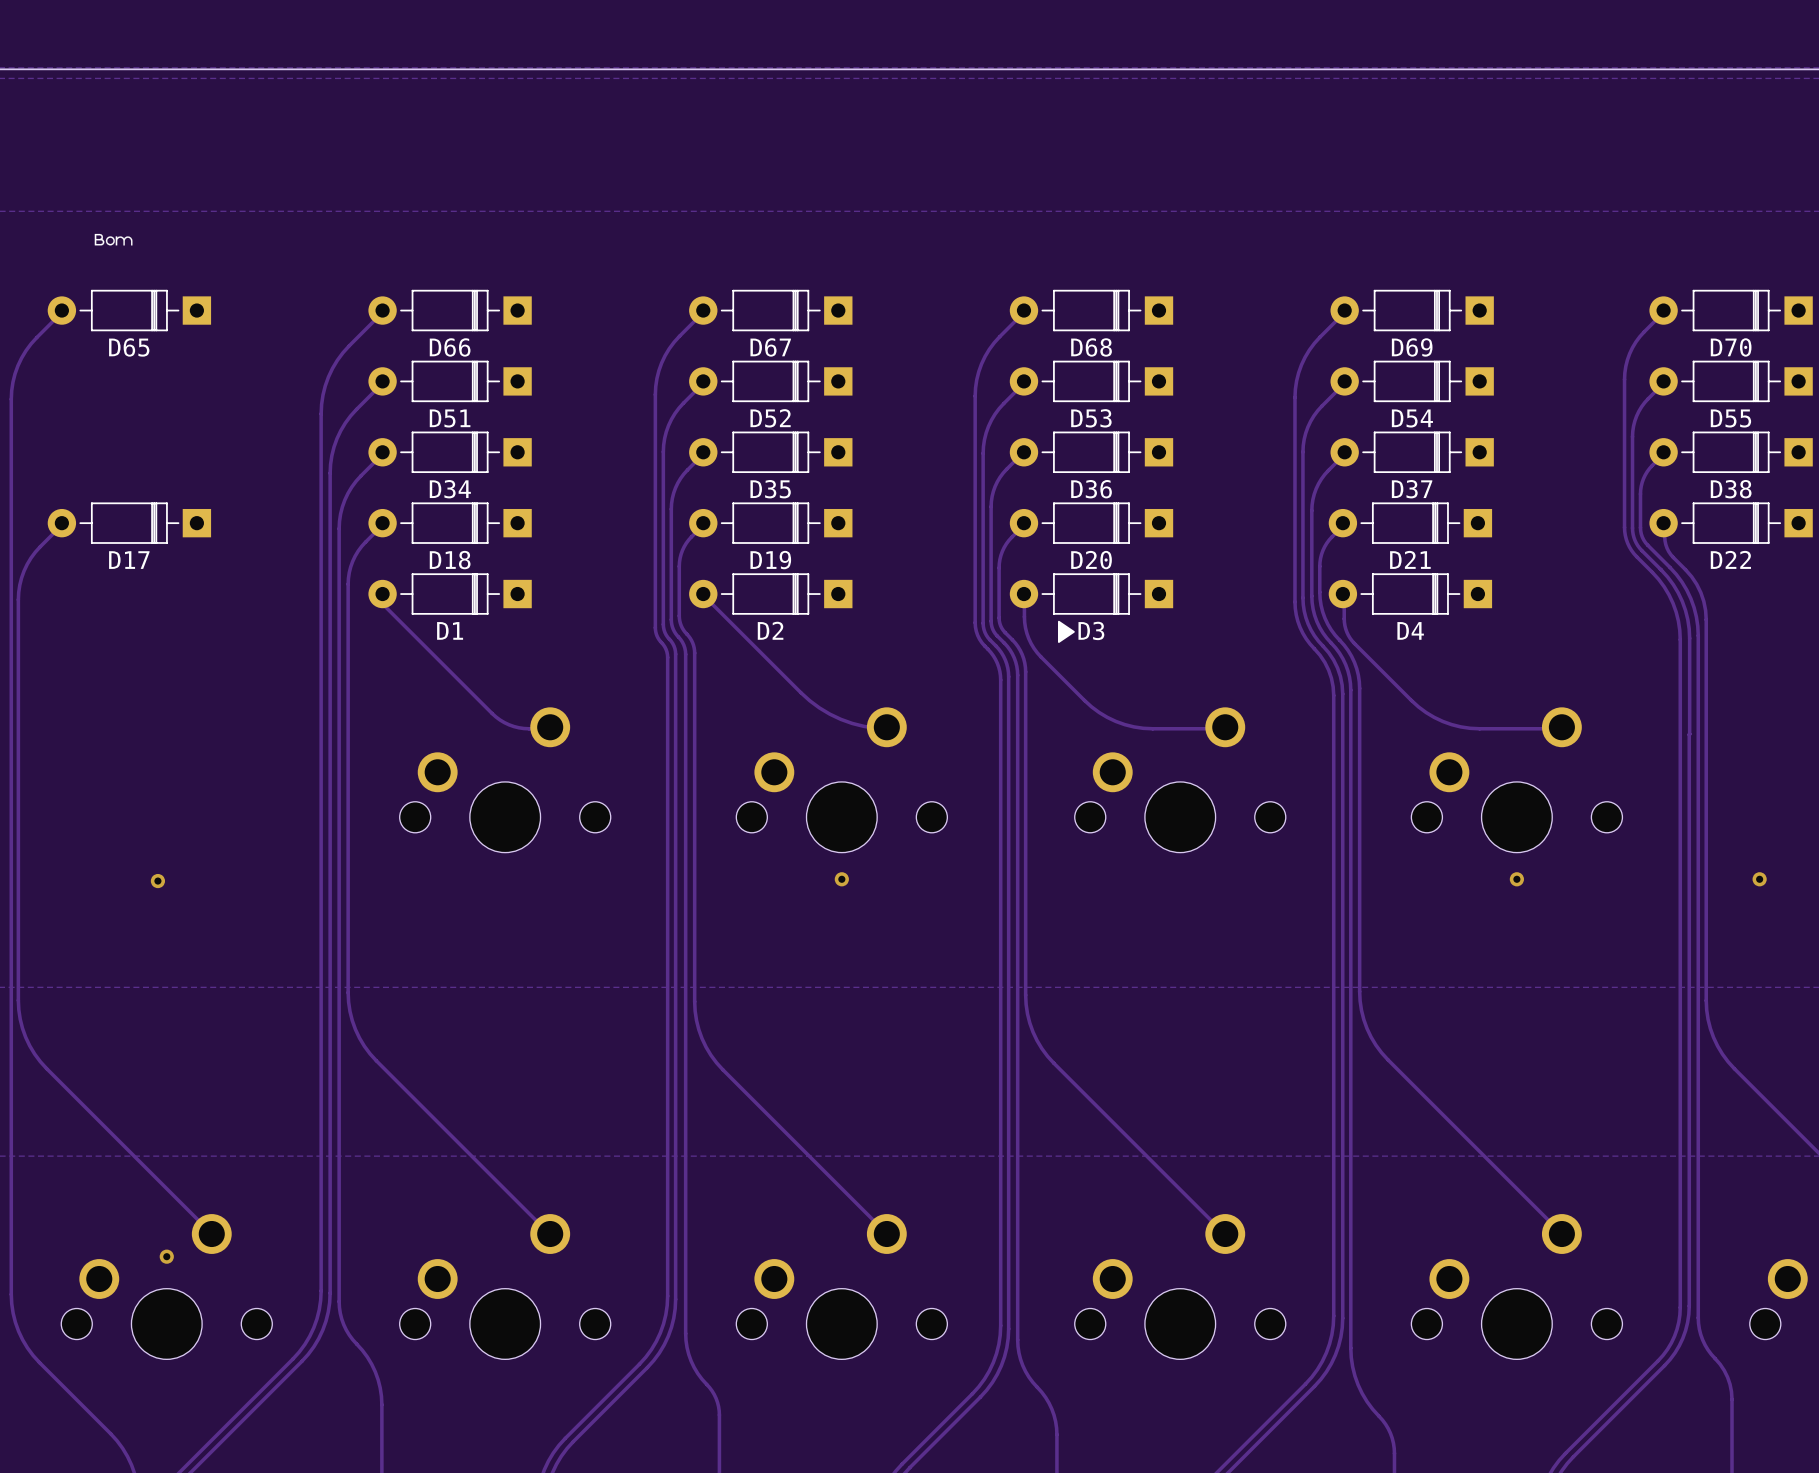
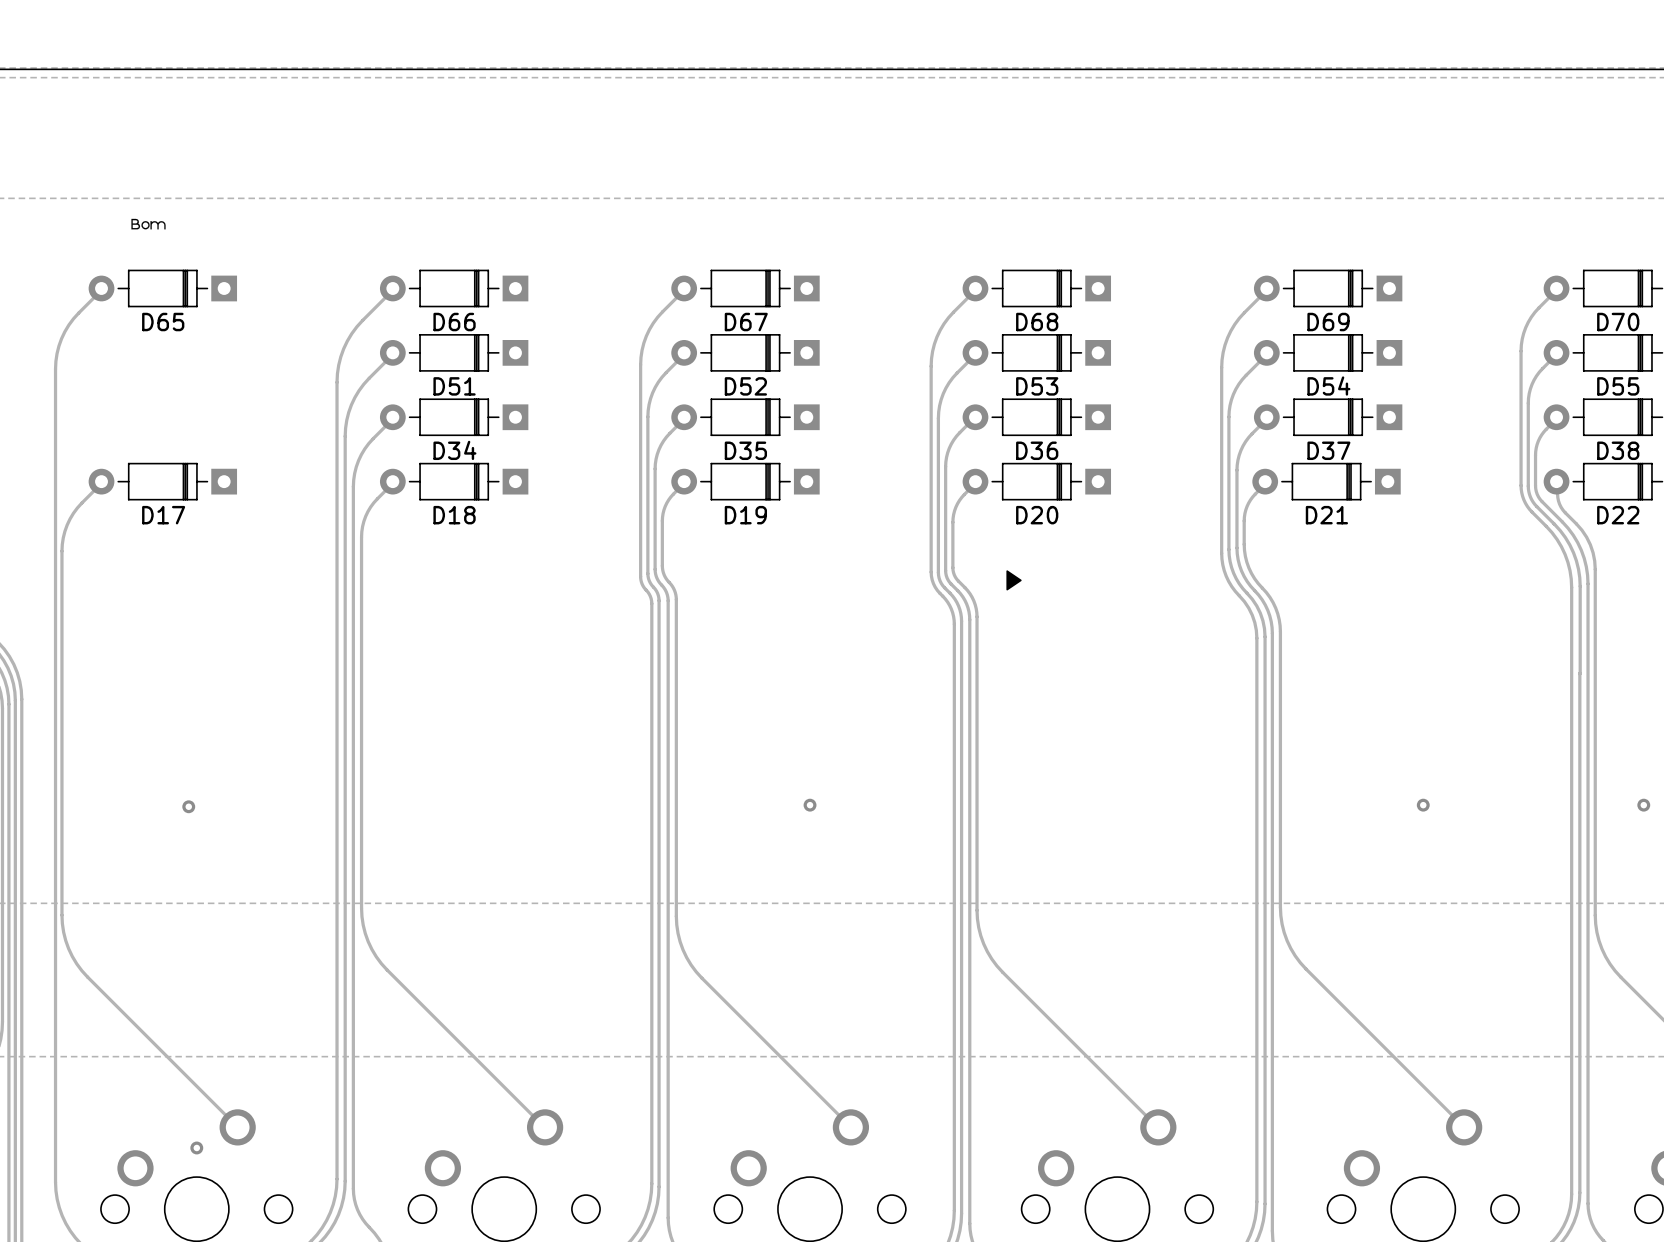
D1: (450, 594) -> none
D2: (770, 594) -> none
D3: (1091, 594) -> none
D4: (1410, 594) -> none
track: (703, 595) (800, 692) (819, 707) (852, 723) (888, 728) -> none
track: (1024, 595) (1025, 627) (1034, 648) (1084, 700) (1099, 712) (1124, 724) (1143, 728) (1225, 728) -> none
track: (383, 604) (495, 716) (509, 724) (518, 727) (550, 728) -> none
track: (1344, 604) (1344, 625) (1352, 640) (1411, 700) (1434, 717) (1451, 724) (1470, 728) (1563, 728) -> none
part: (505, 779) -> none
part: (841, 779) -> none
part: (1180, 779) -> none
part: (1516, 779) -> none

